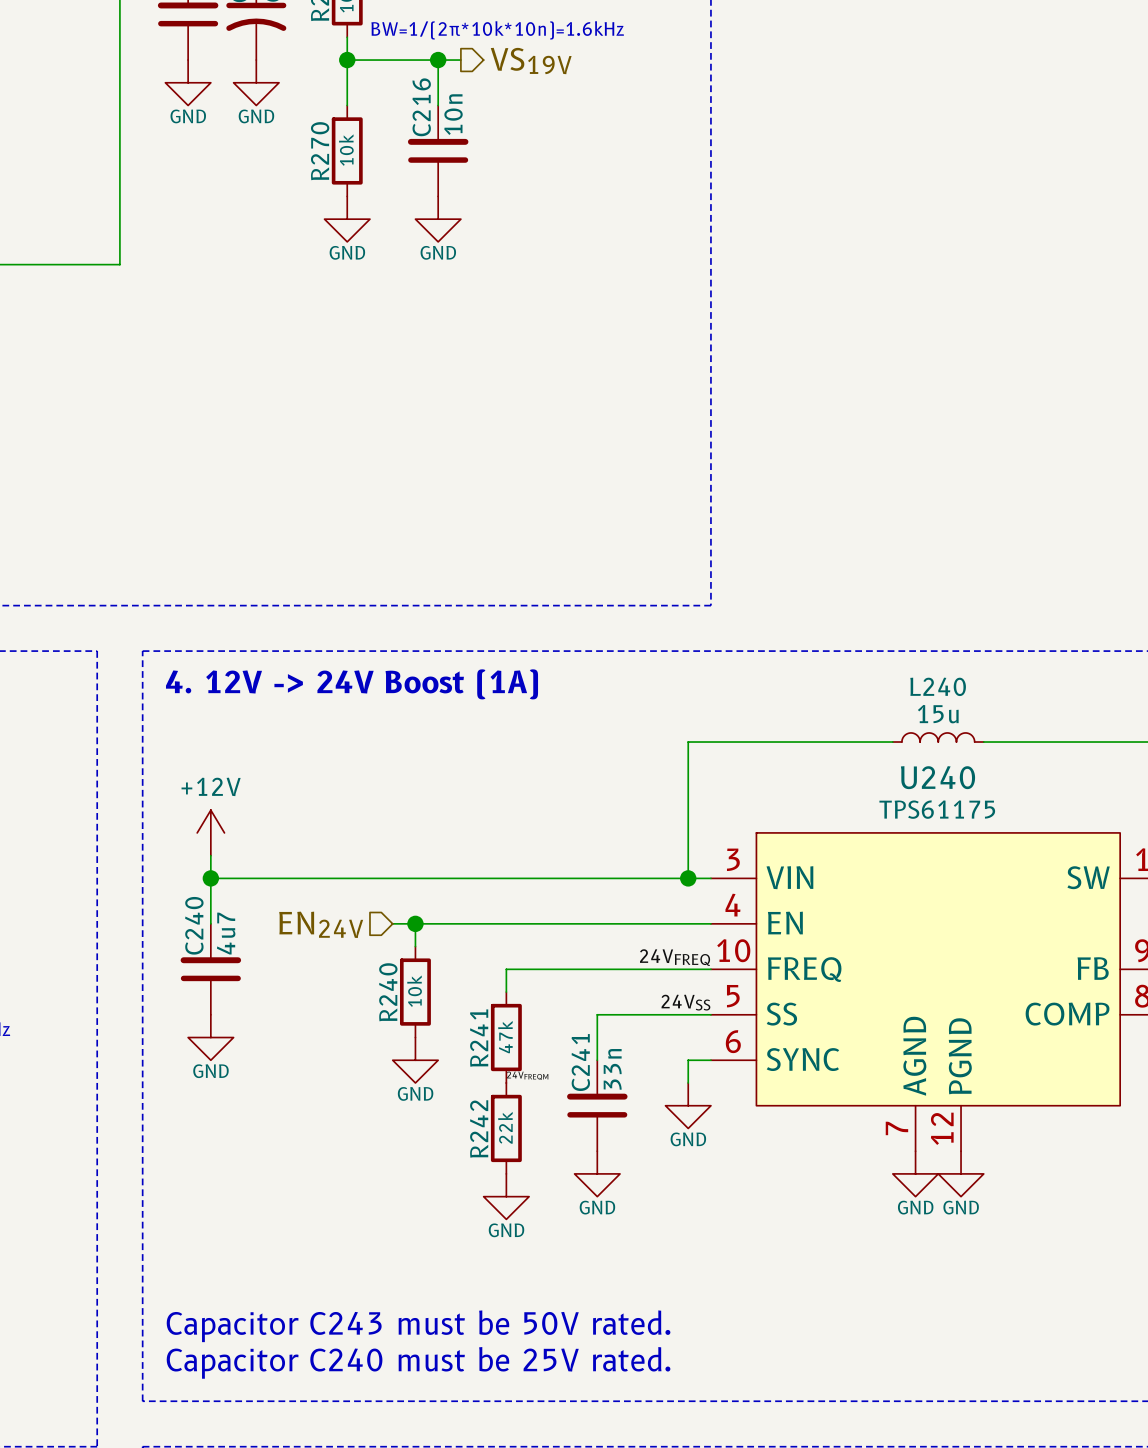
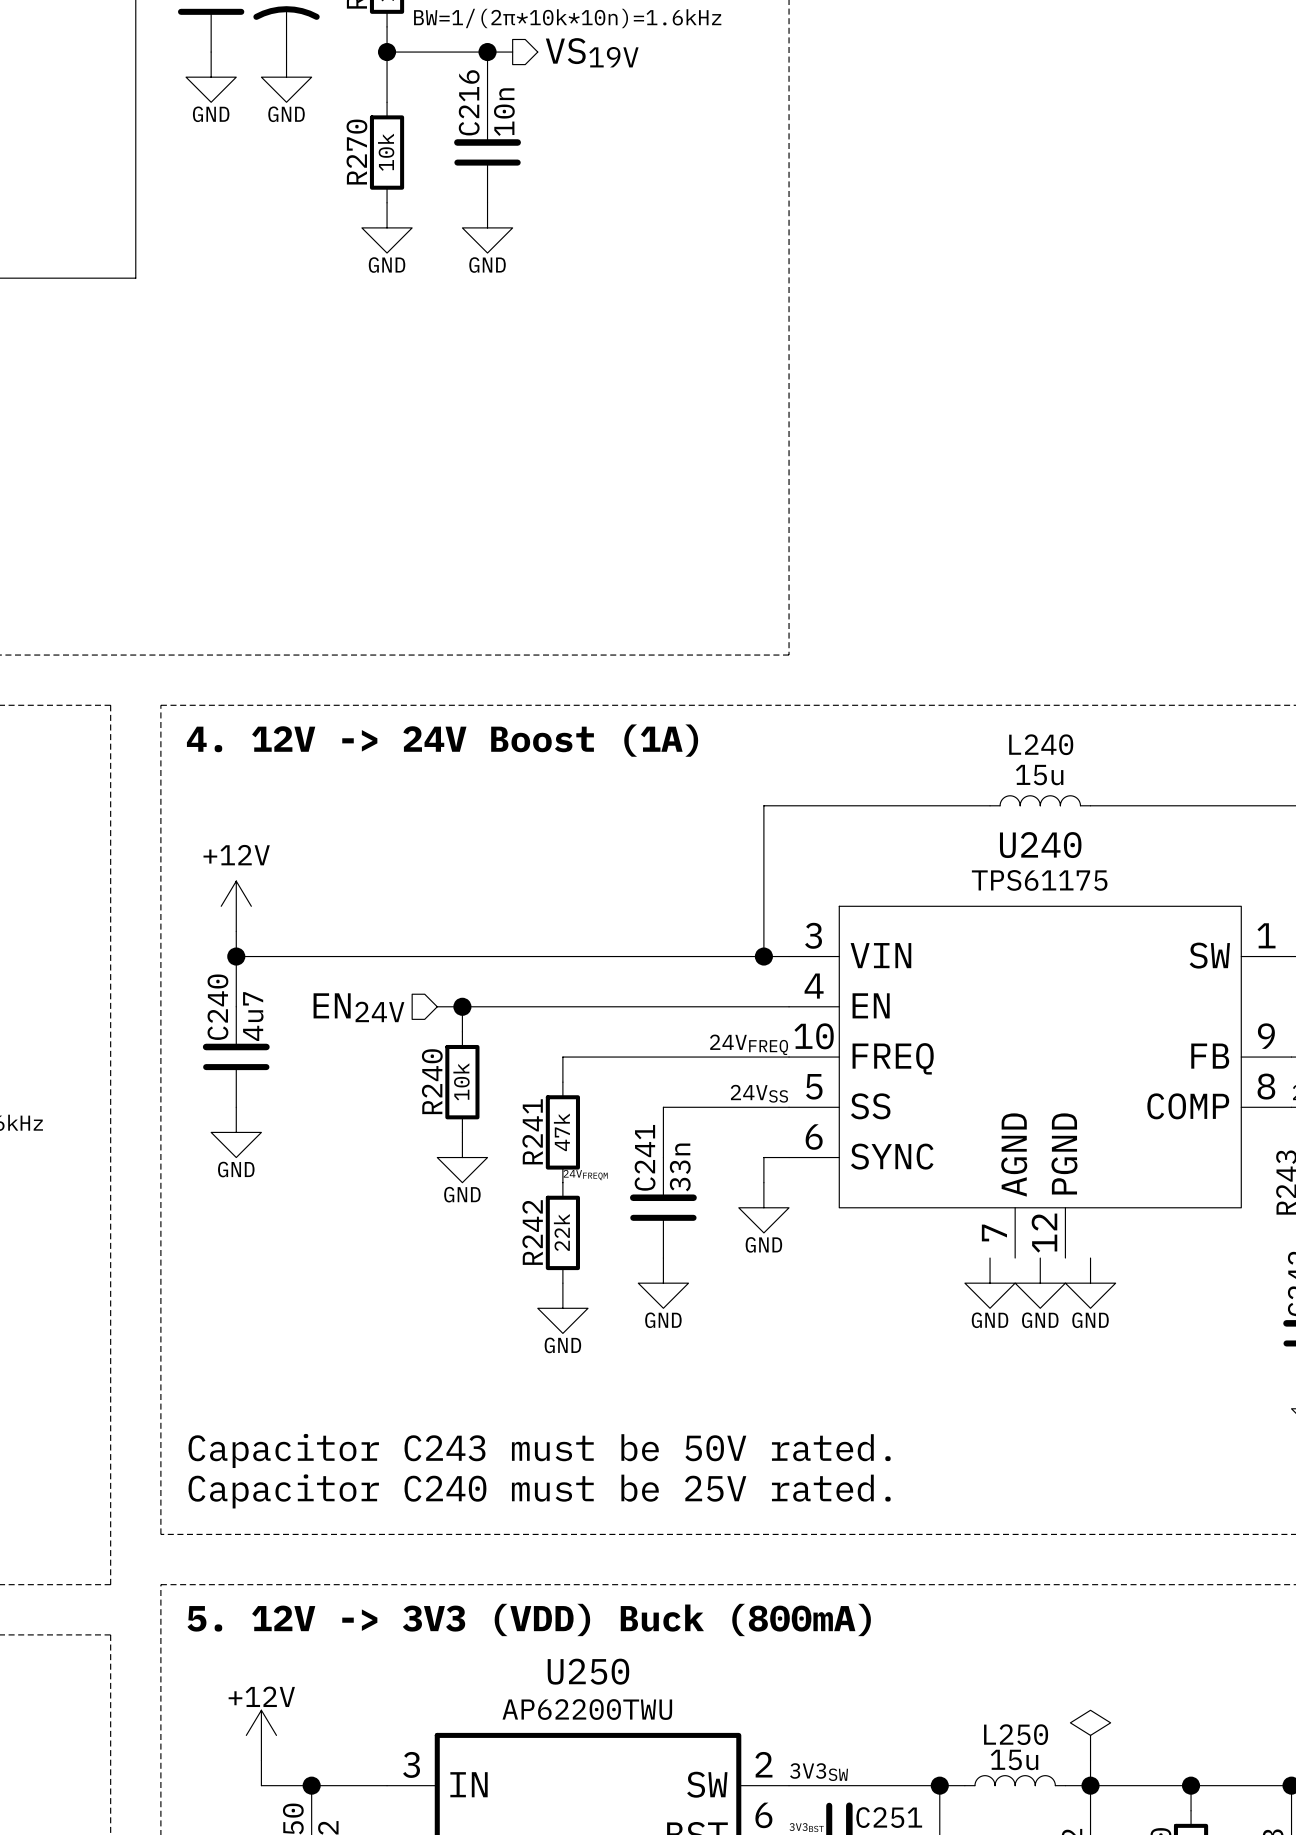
power symbol: none -> GND (990, 1283)
power symbol: GND (915, 1173) -> none
power symbol: none -> GND (1040, 1283)
power symbol: GND (961, 1173) -> none
power symbol: none -> GND (1090, 1283)

